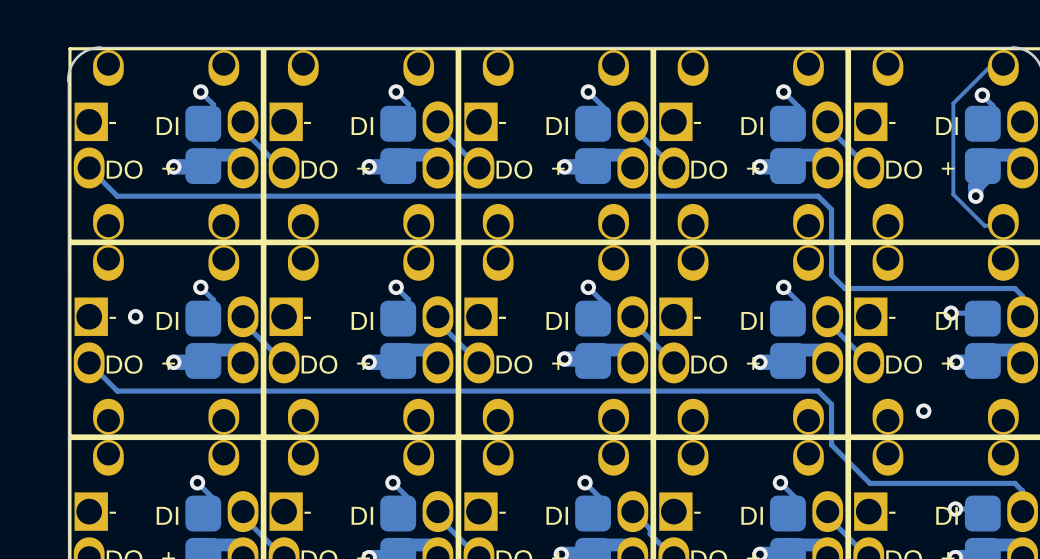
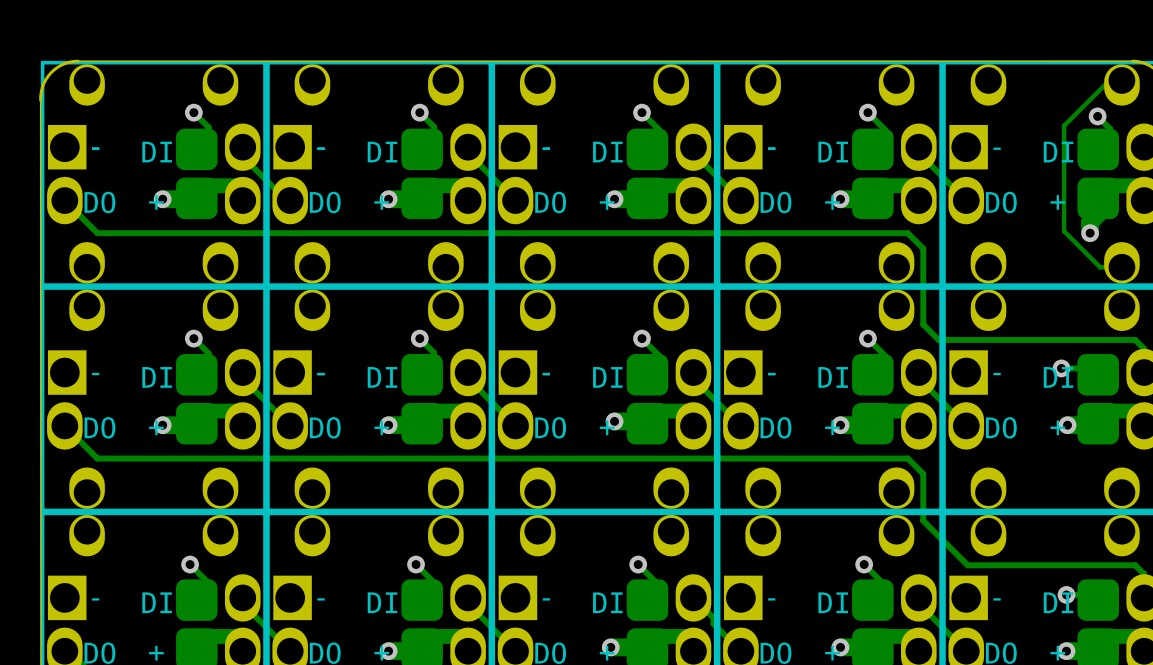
via: (135, 316) -> none
via: (923, 411) -> none

